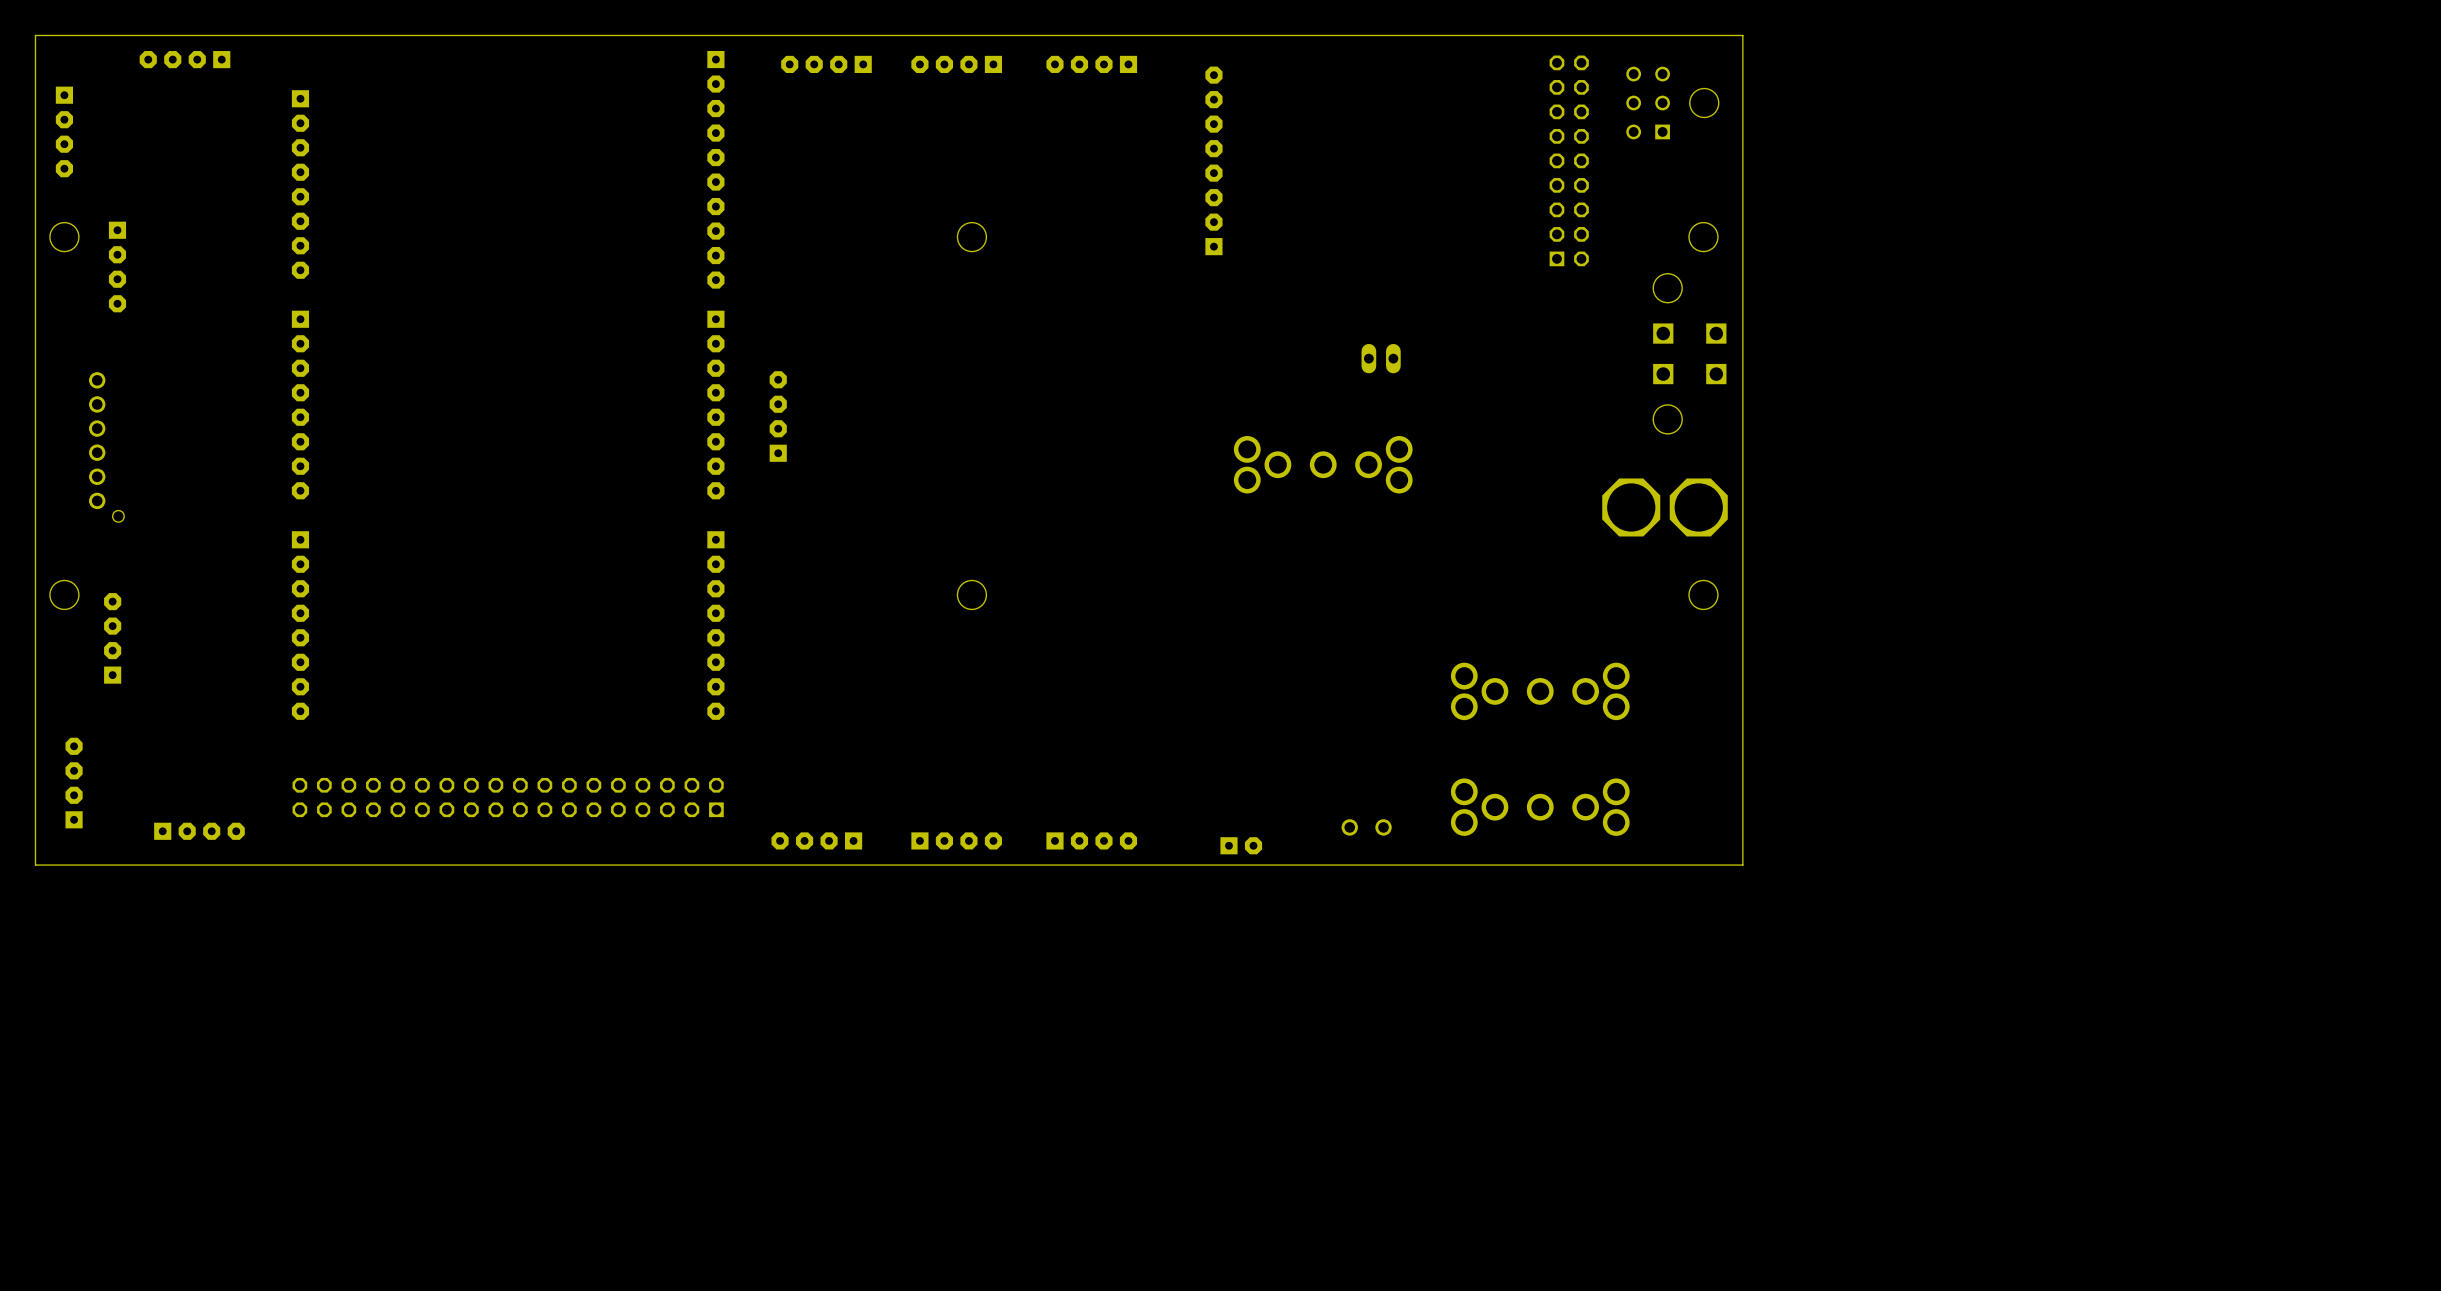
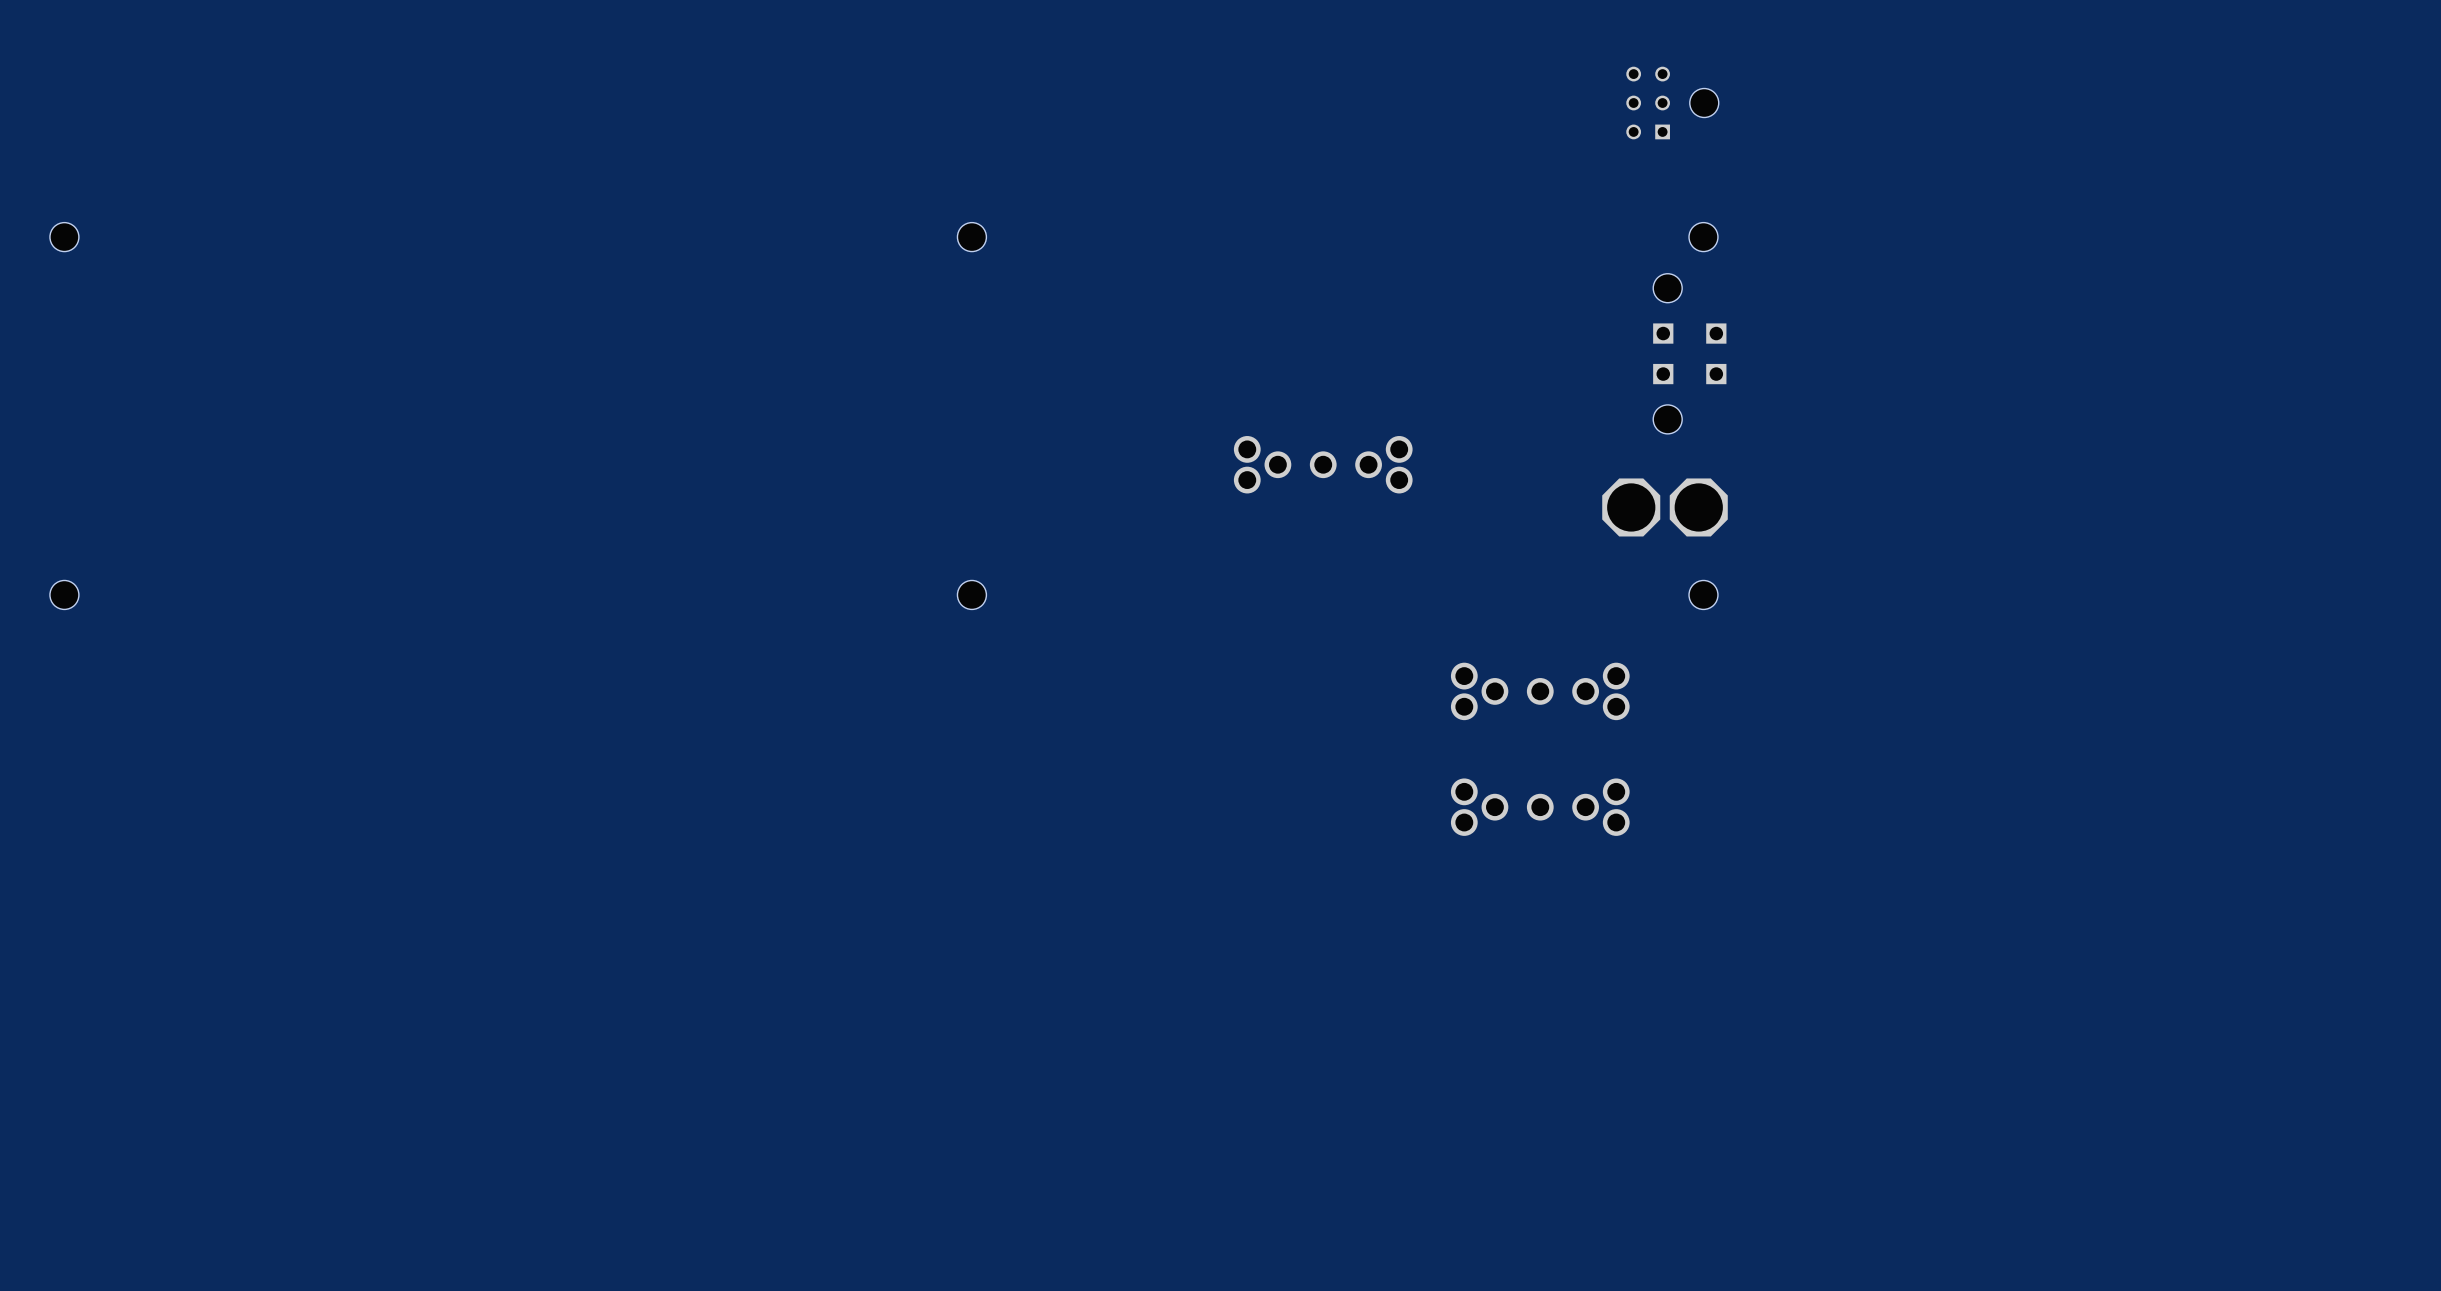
board edge: (1742, 35) (35, 35) (35, 865) (1742, 865) (1742, 35) -> none
part: (185, 59) -> none
part: (826, 64) -> none
part: (956, 64) -> none
part: (1091, 64) -> none
part: (64, 131) -> none
part: (1213, 160) -> none
part: (1569, 160) -> none
part: (715, 169) -> none
part: (300, 184) -> none
part: (117, 266) -> none
part: (1381, 358) -> none
part: (300, 405) -> none
part: (715, 405) -> none
part: (778, 416) -> none
part: (106, 447) -> none
part: (300, 625) -> none
part: (715, 625) -> none
part: (112, 638) -> none
part: (74, 783) -> none
part: (508, 797) -> none
part: (1366, 827) -> none
part: (199, 831) -> none
part: (816, 840) -> none
part: (956, 840) -> none
part: (1091, 840) -> none
part: (1241, 845) -> none

